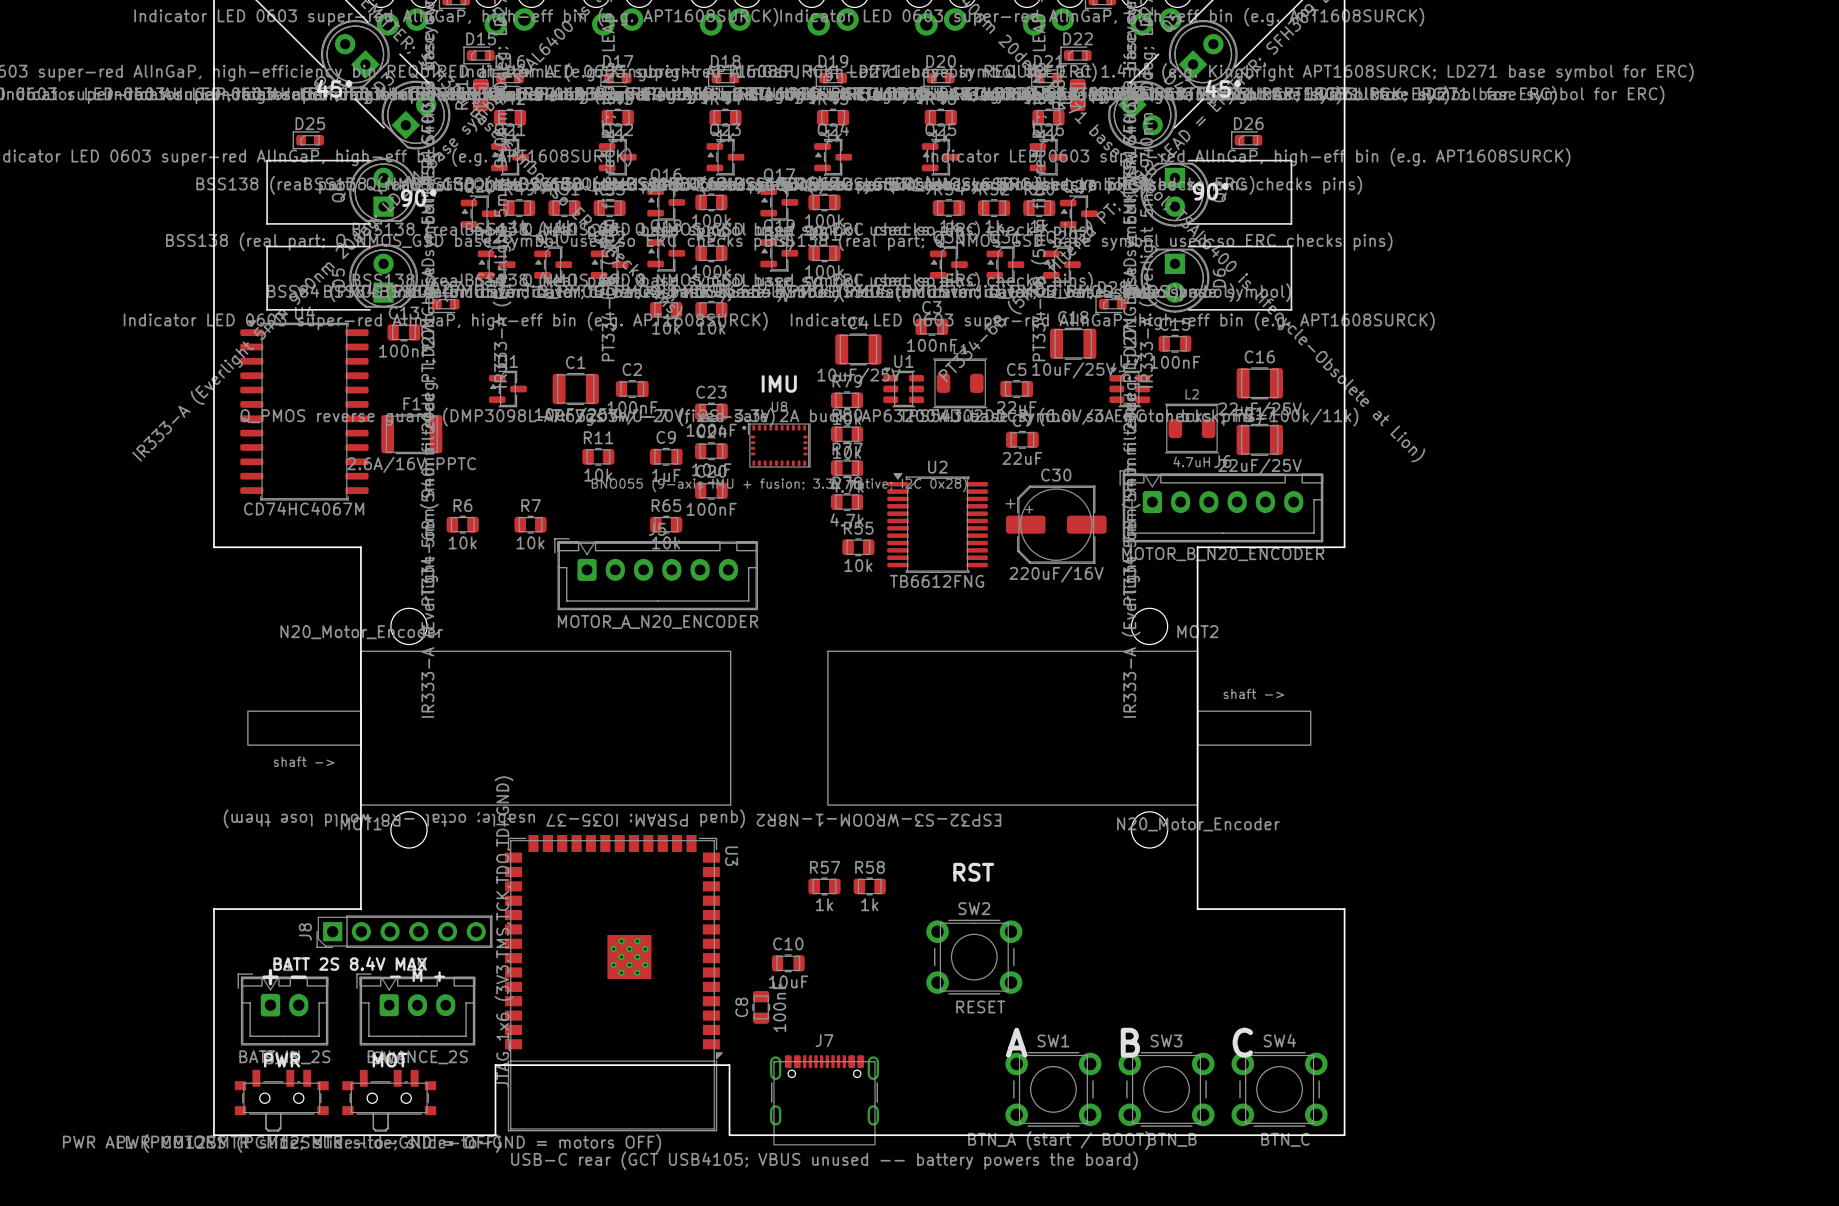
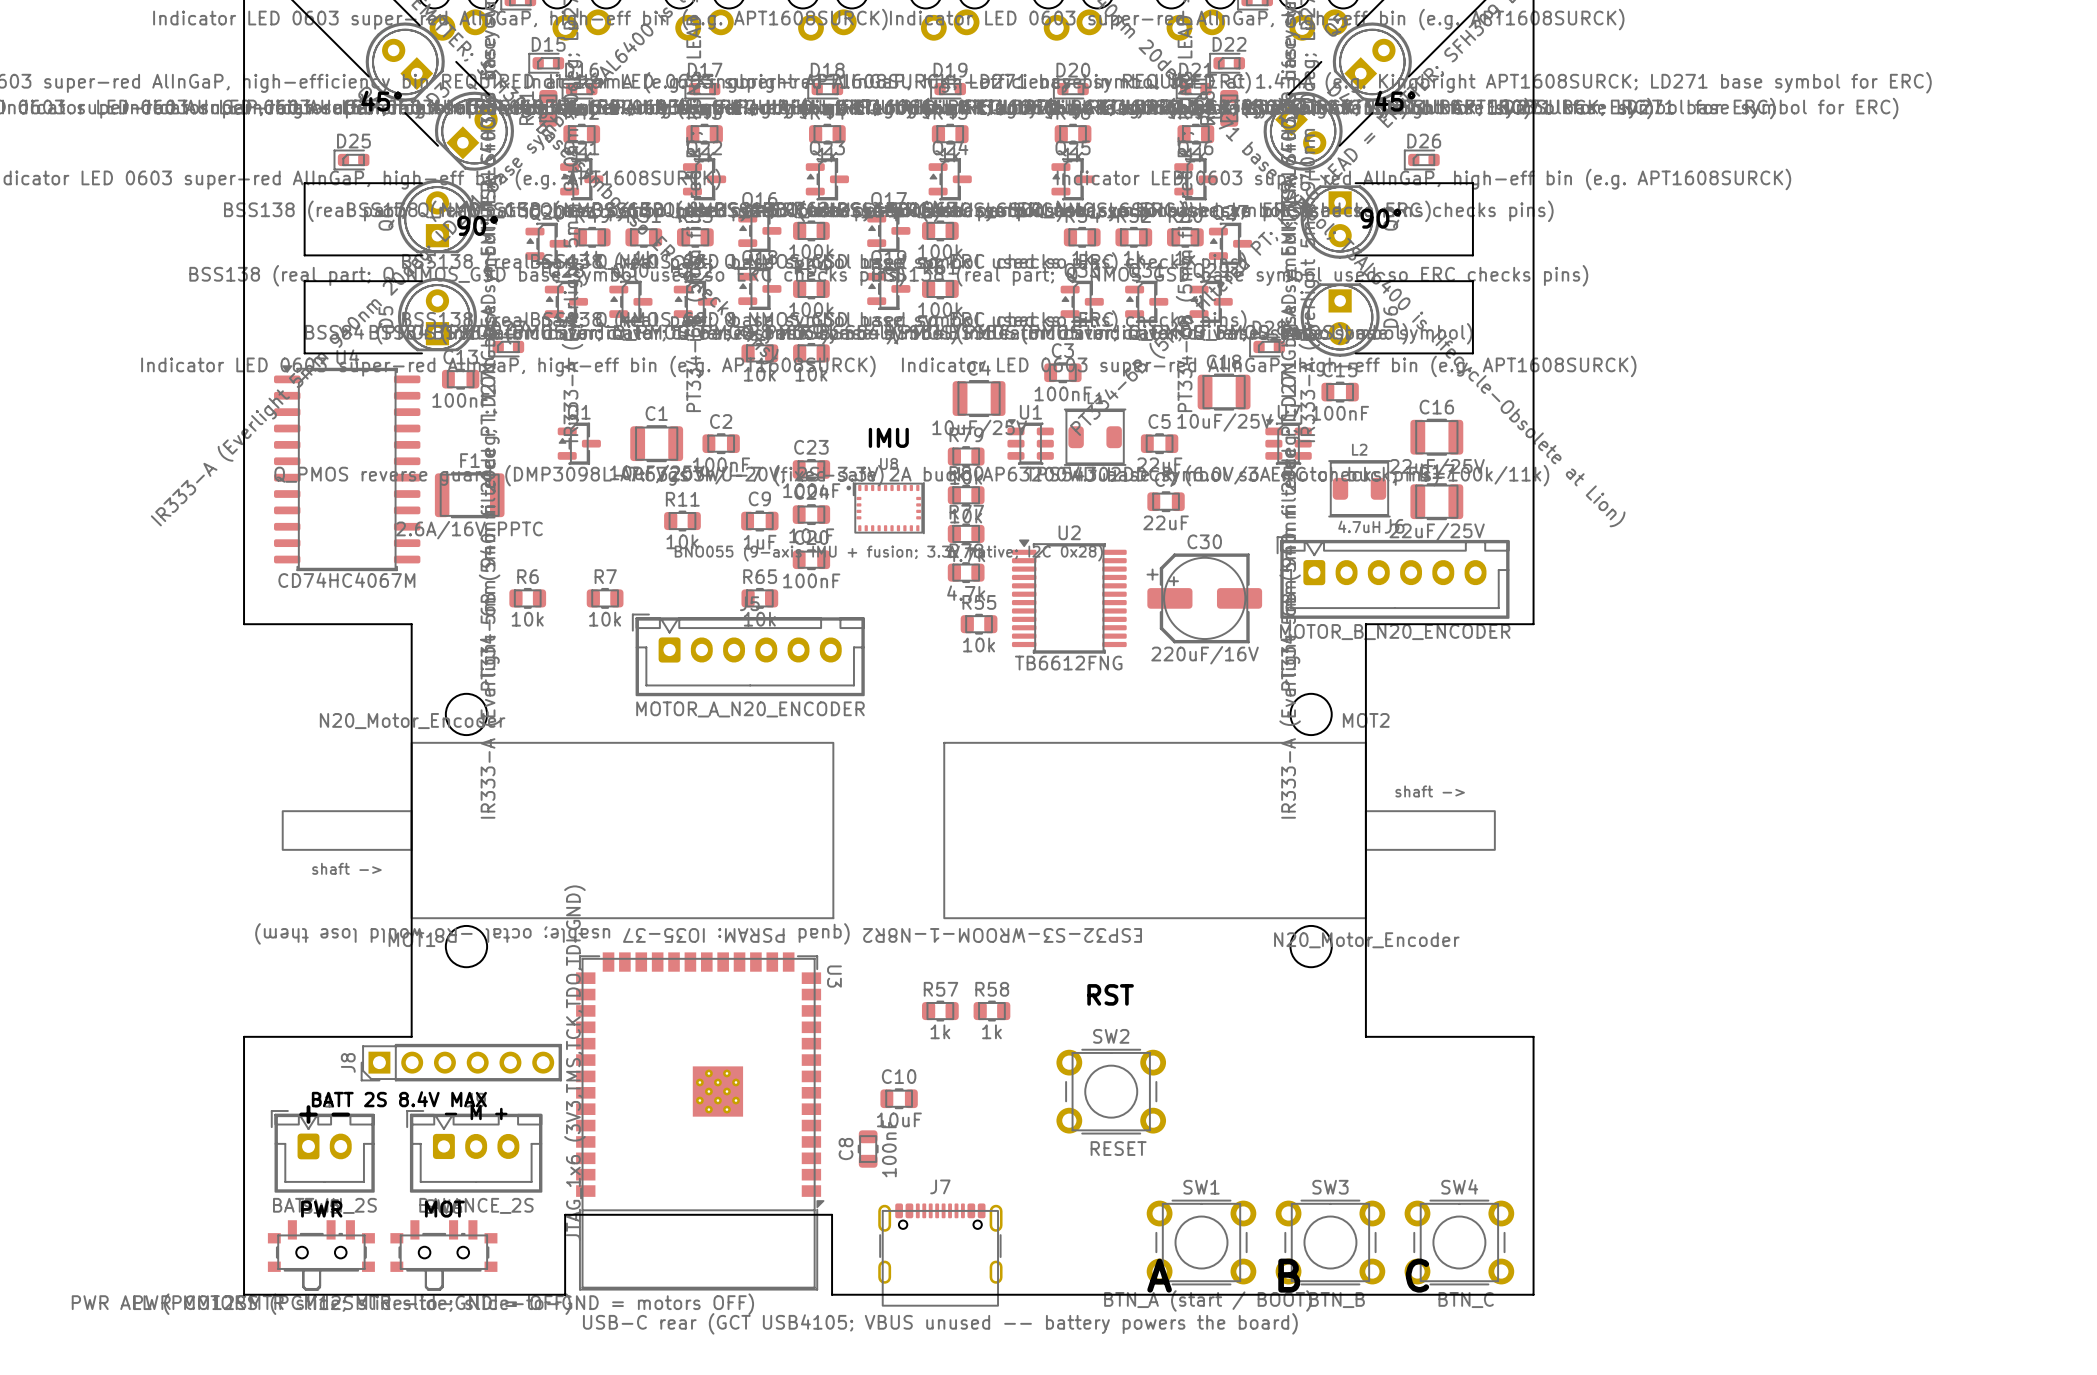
text position: A (1016, 1042) -> A (1159, 1275)
text position: B (1130, 1042) -> B (1289, 1275)
text position: C (1242, 1042) -> C (1417, 1275)

